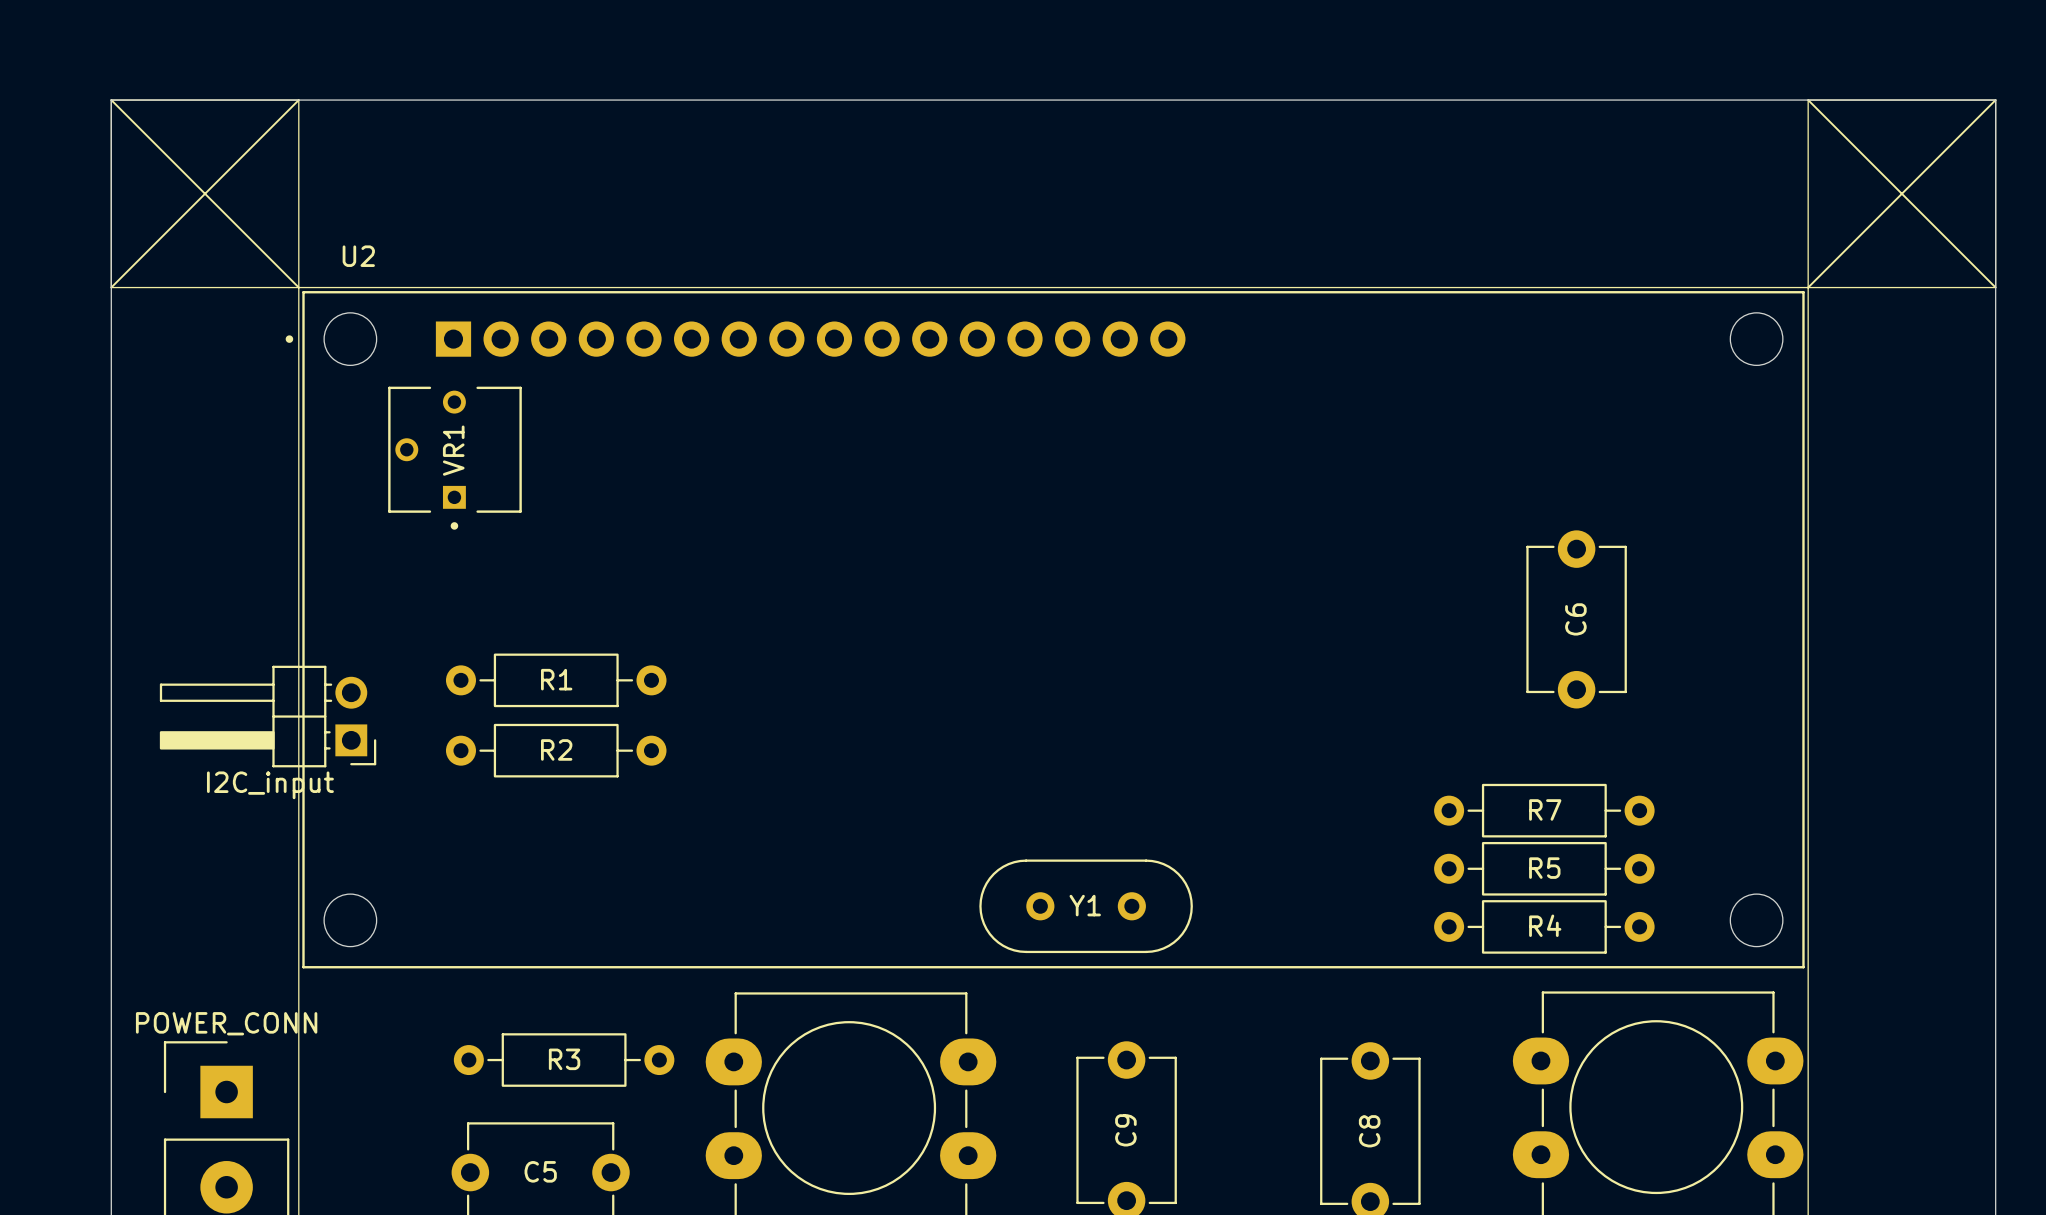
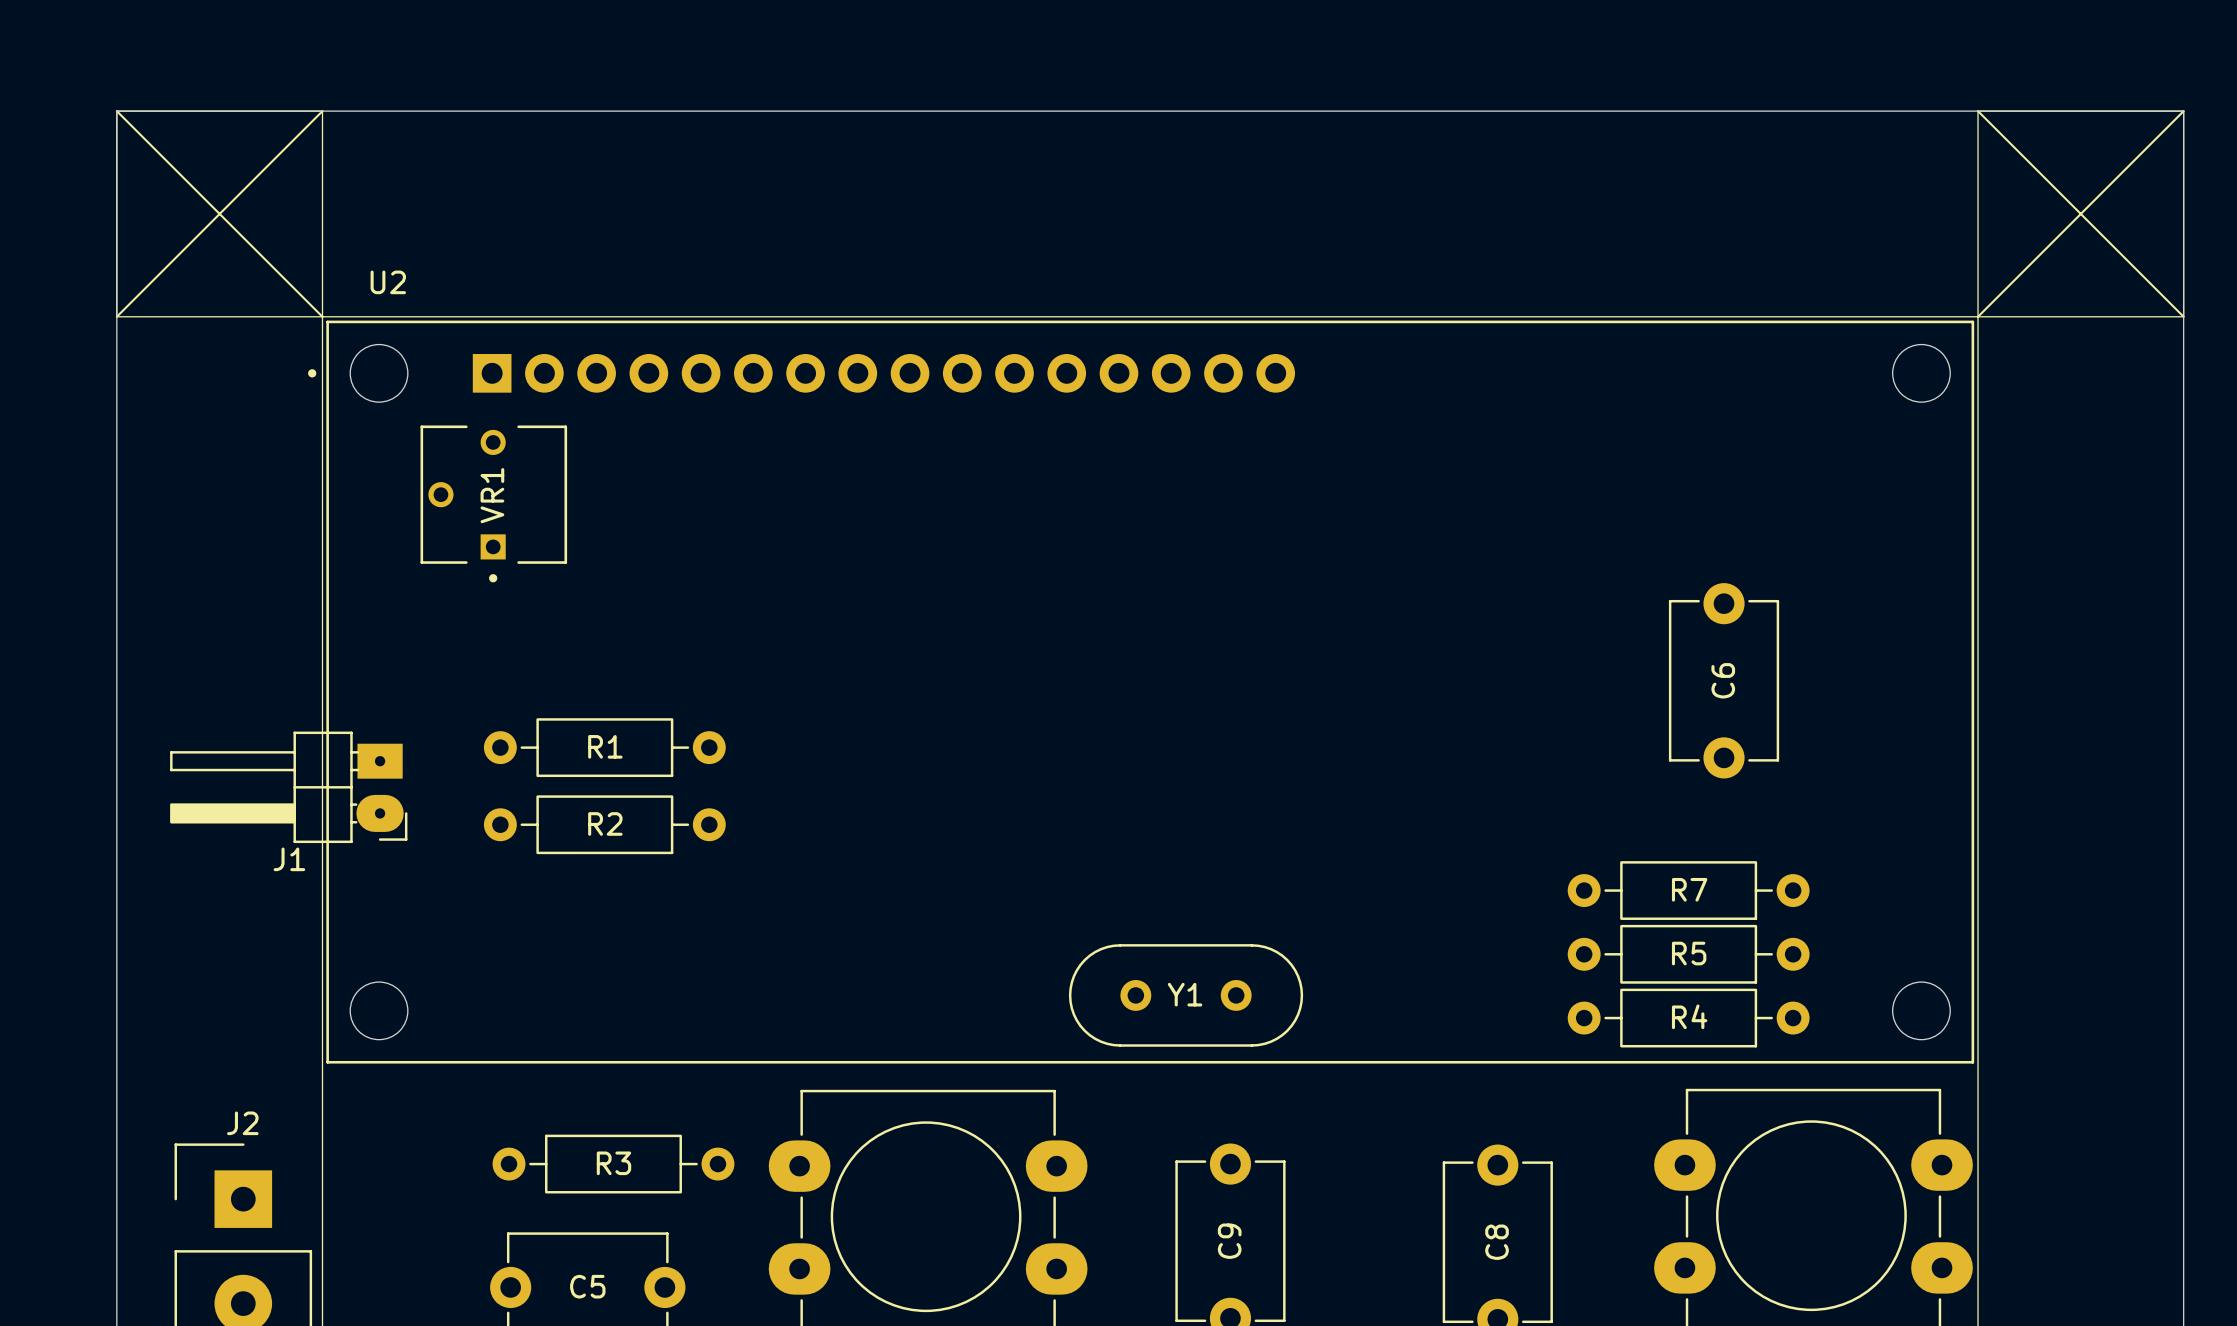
I2C_input: (268, 716) -> none
J1: none -> (288, 787)
POWER_CONN name: POWER_CONN (226, 1023) -> J2 (242, 1123)

